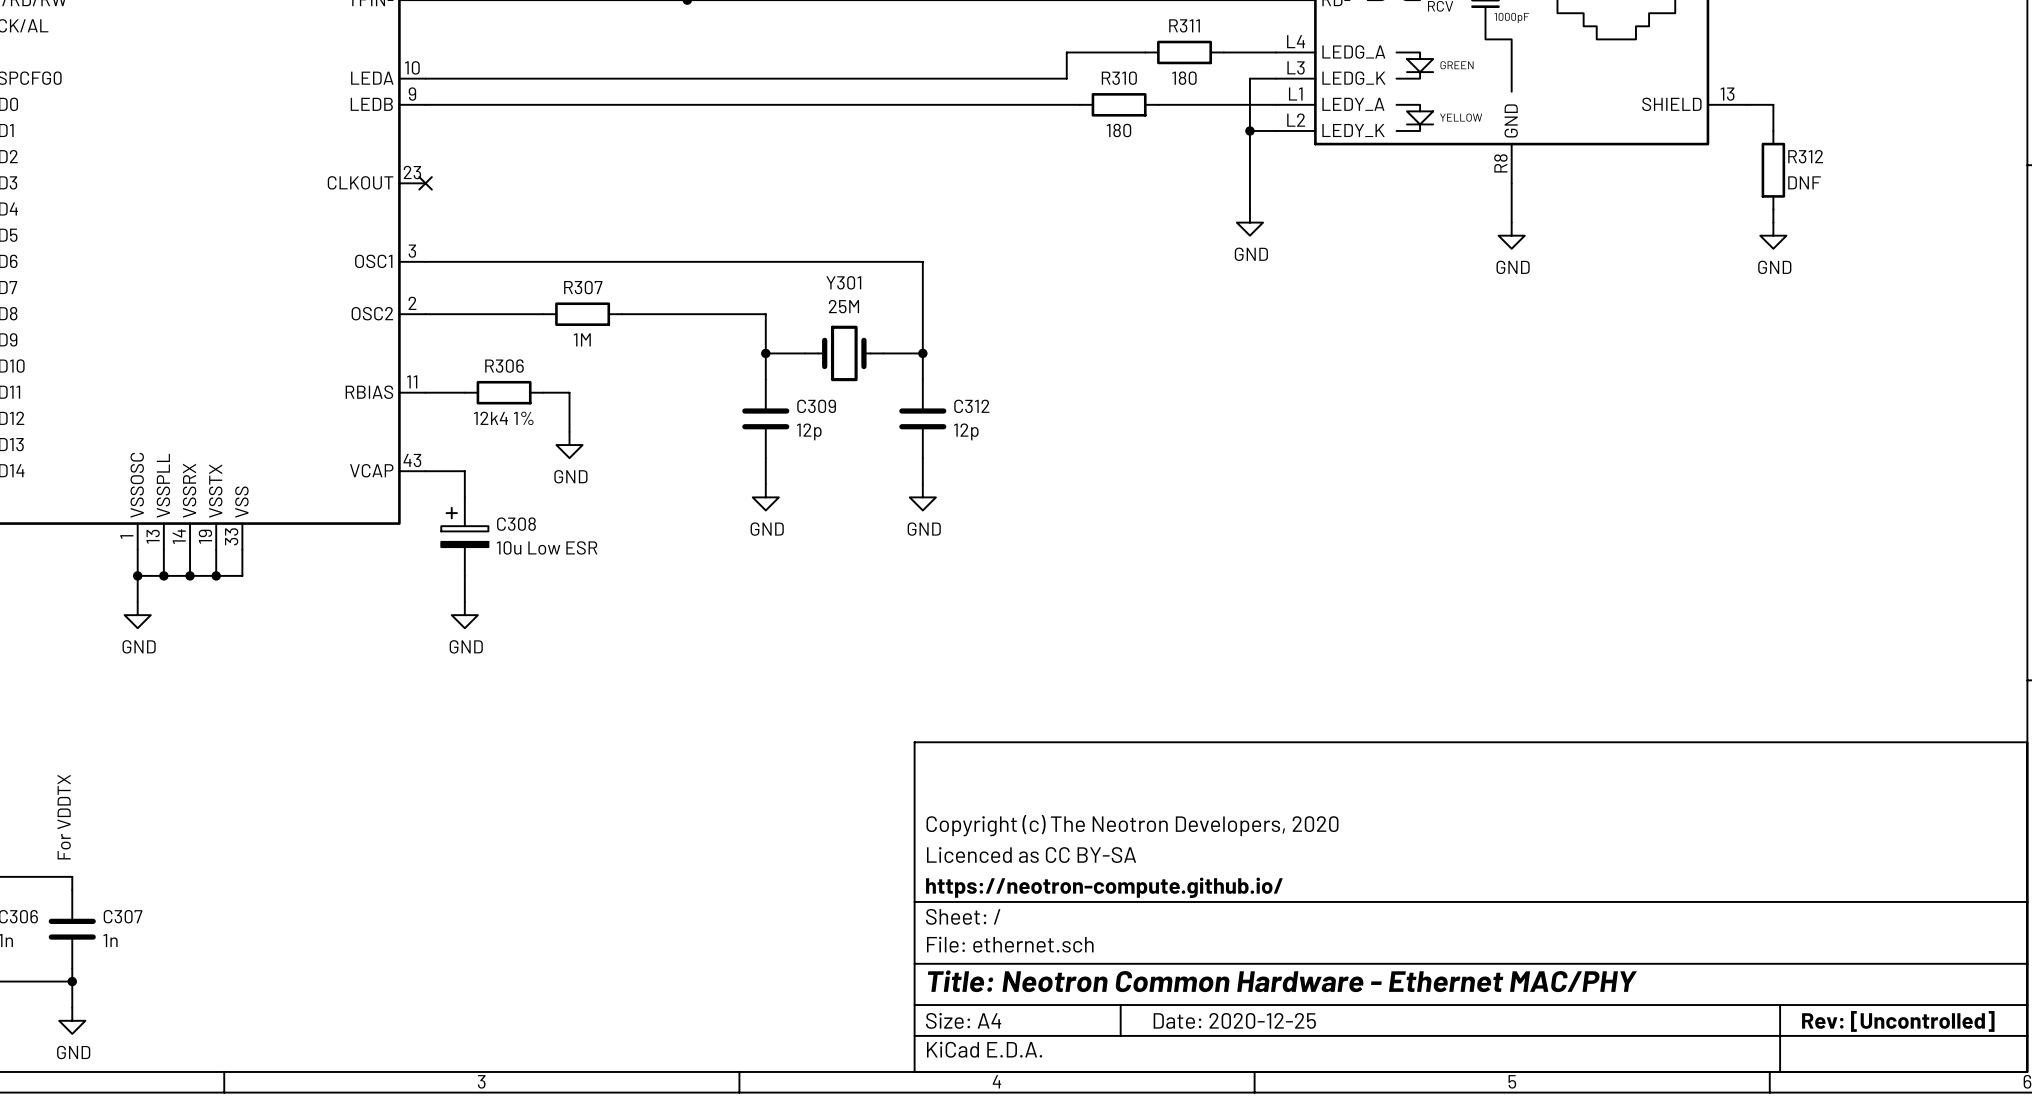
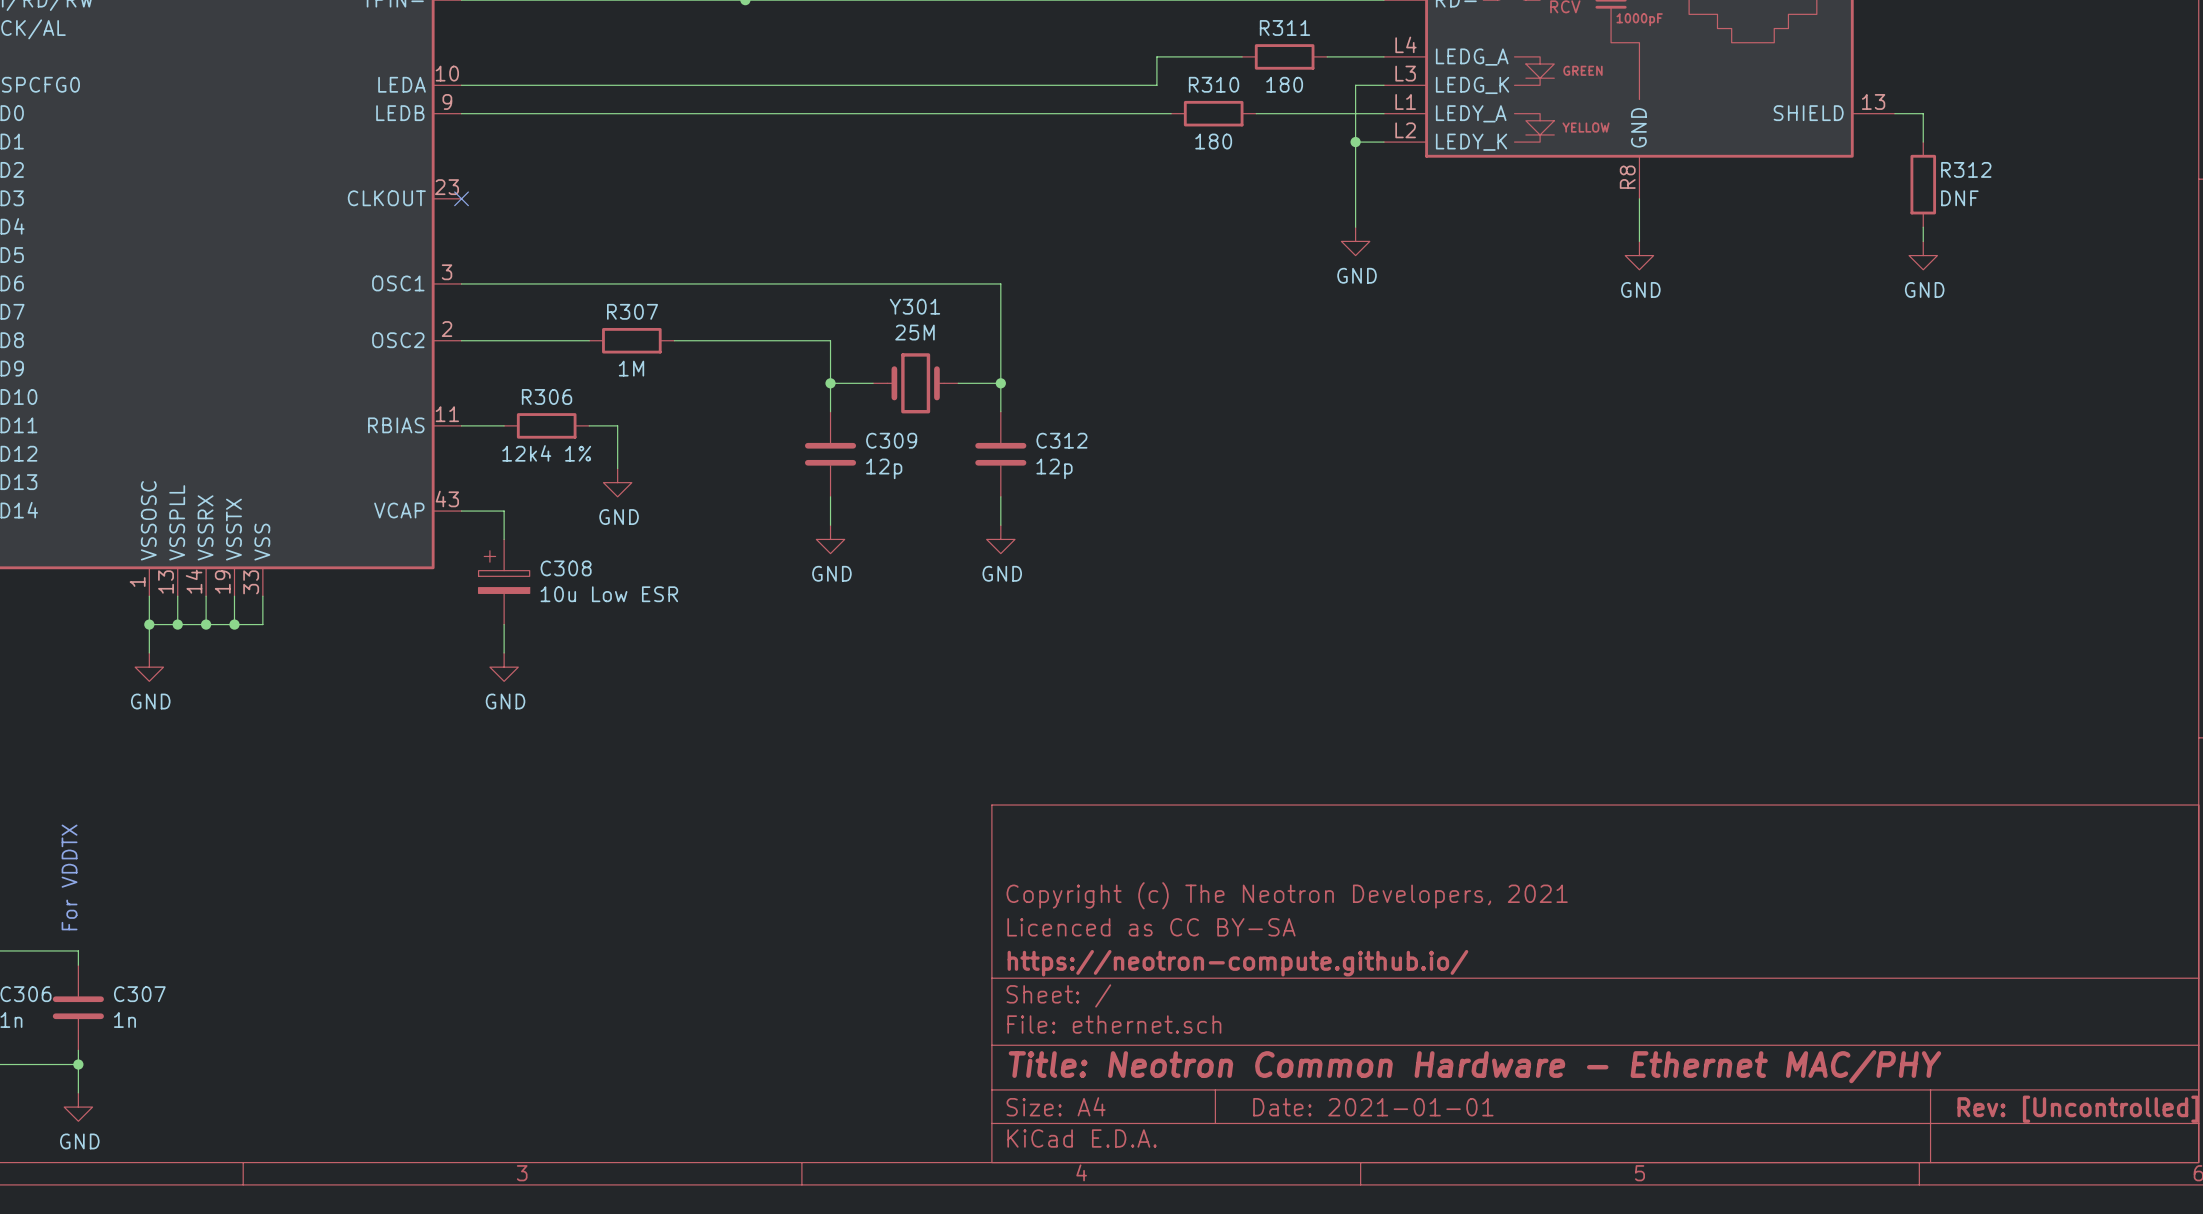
title block: Copyright (c) The Neotron Developers, 2020 (1132, 825) -> Copyright (c) The Neotron Developers, 2021 (1287, 895)
title block: Date: 2020-12-25 (1234, 1020) -> Date: 2021-01-01 (1373, 1107)

